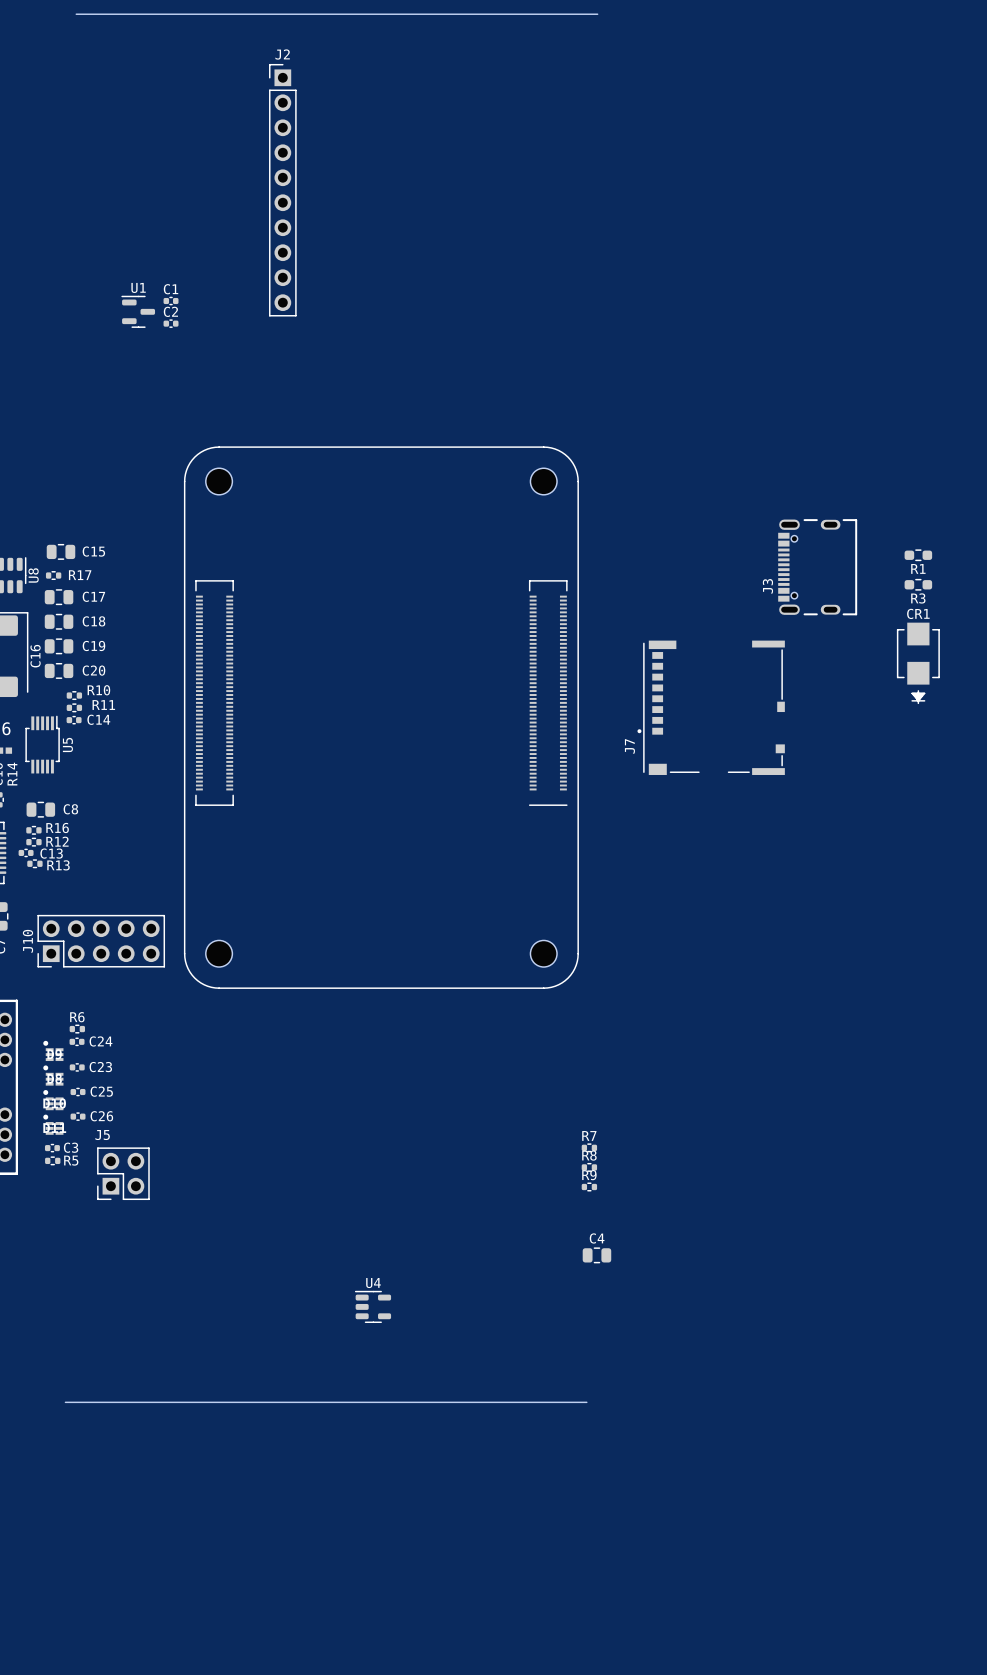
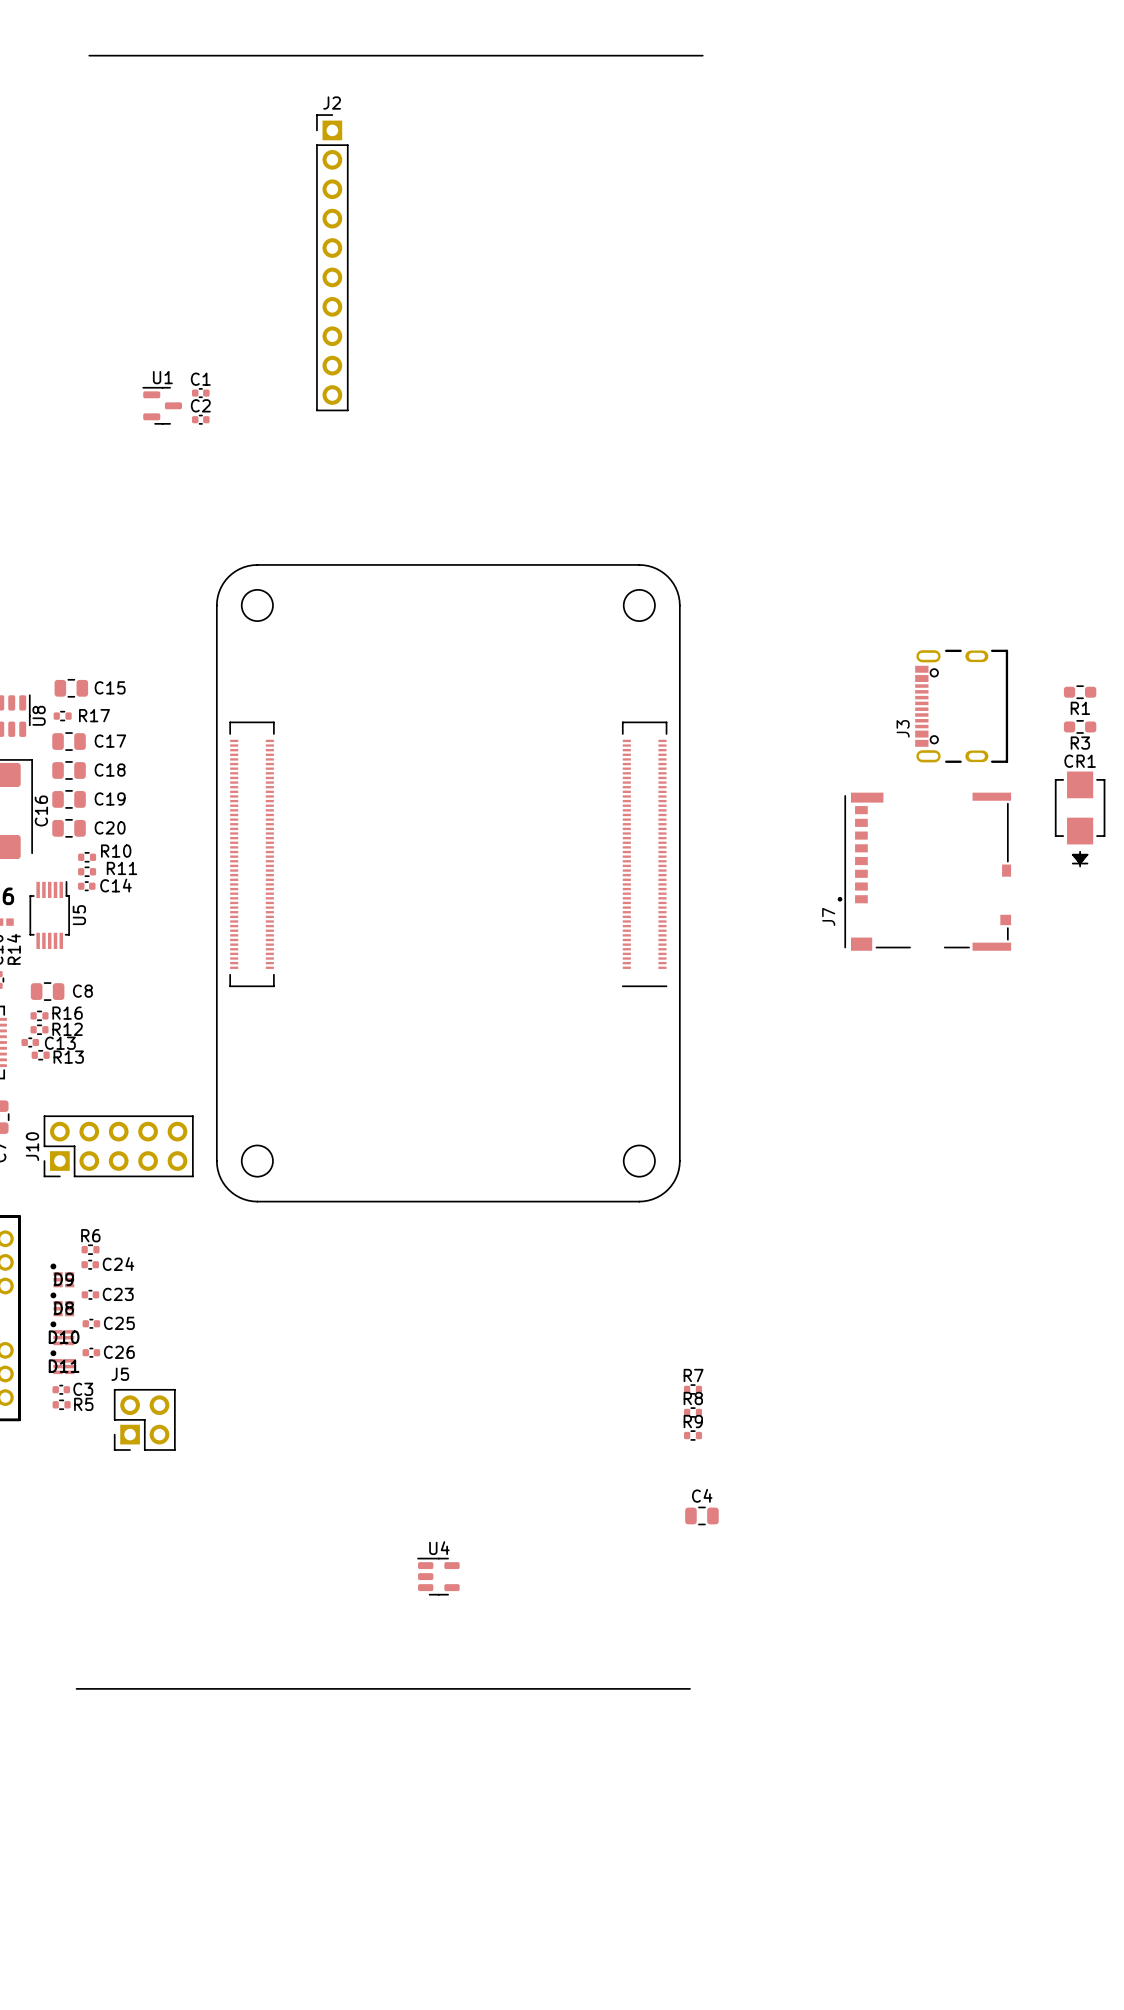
J7 position: (711, 707) -> (924, 871)

